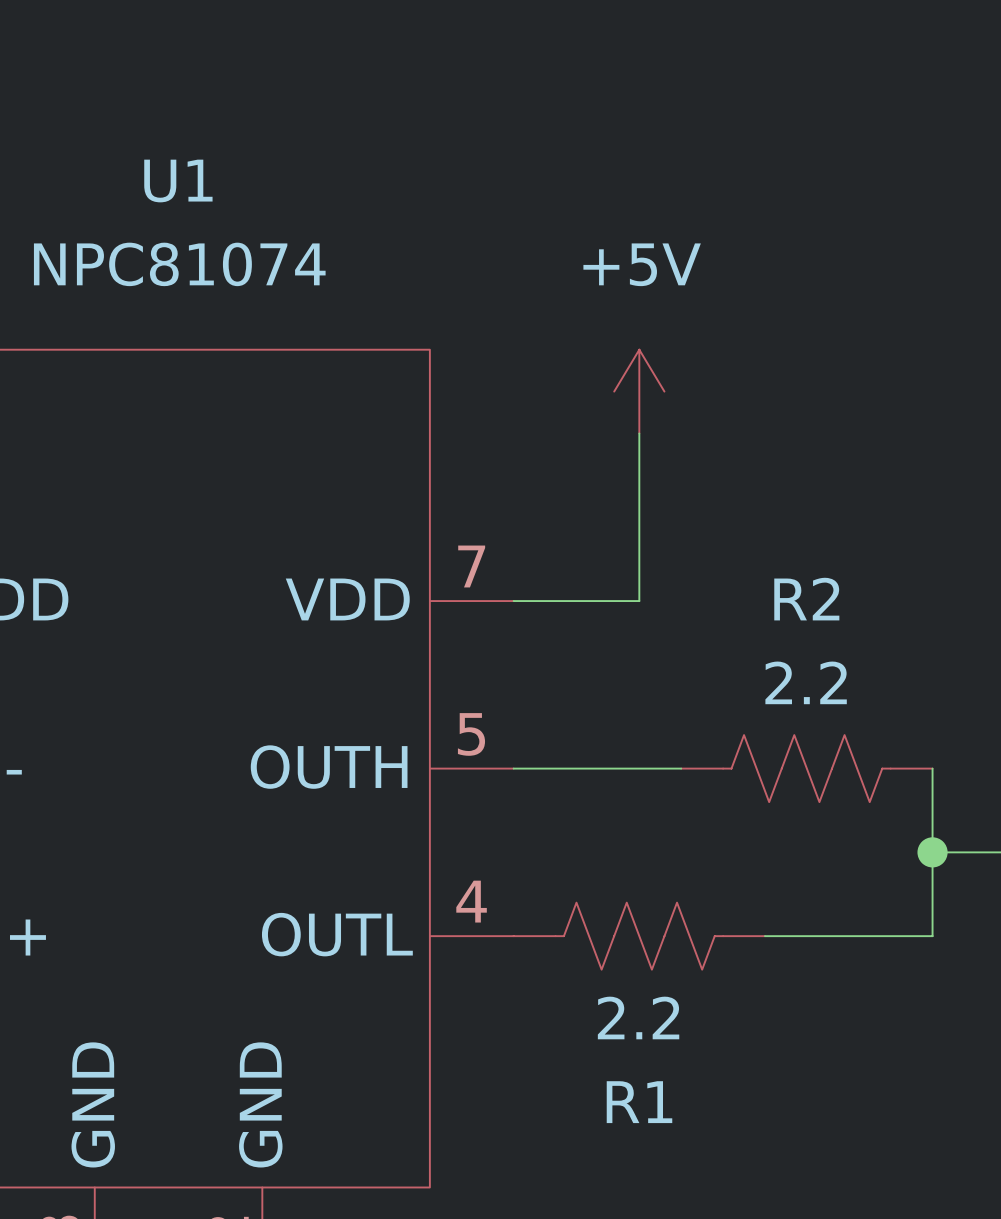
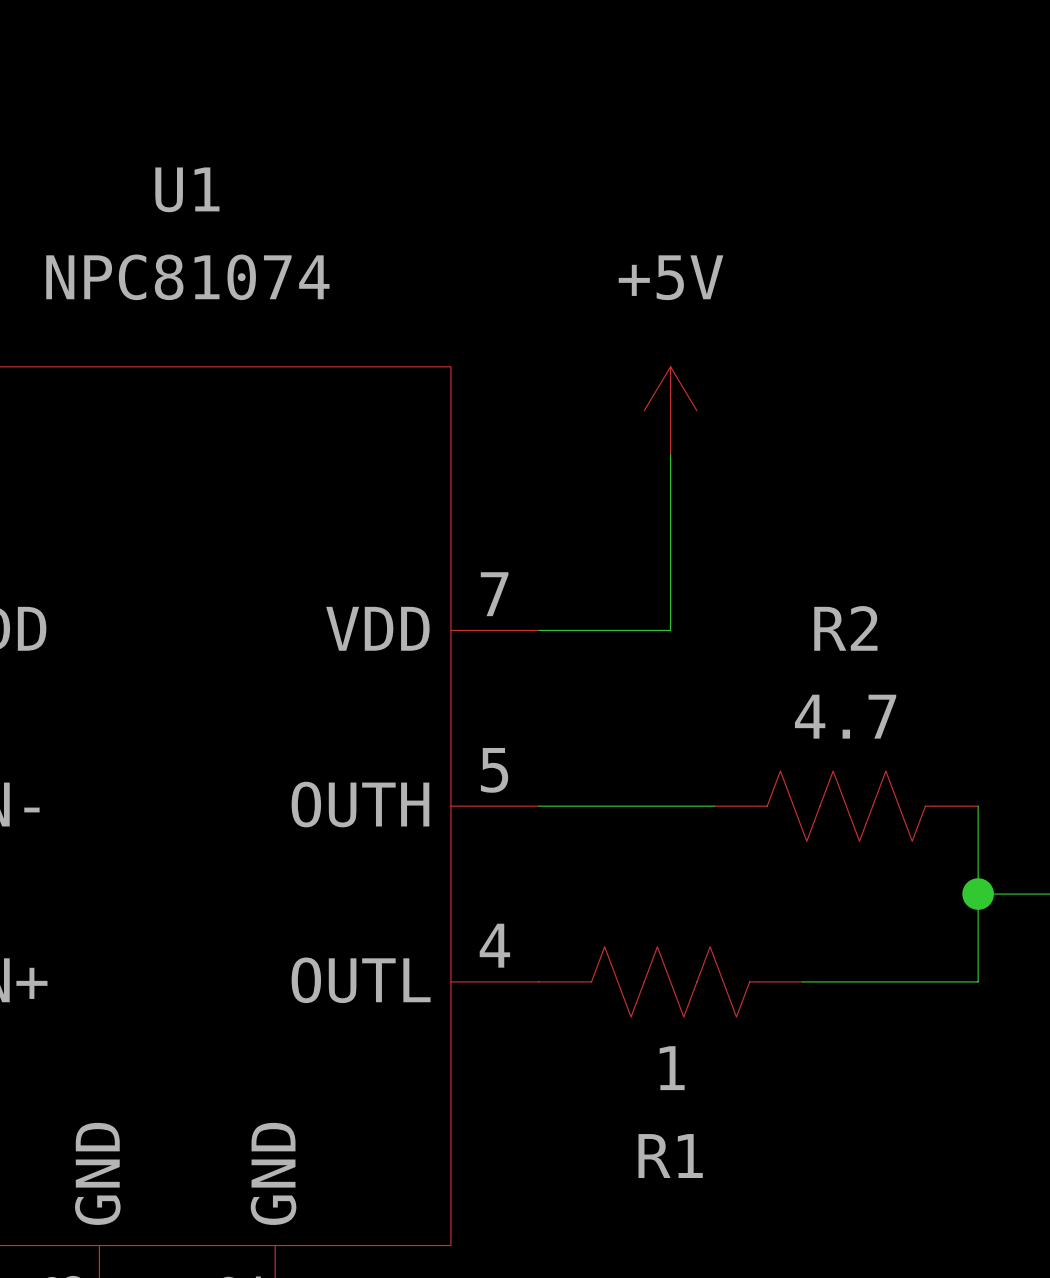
R2 value: 2.2 (806, 682) -> 4.7 (845, 716)
R1 value: 2.2 (638, 1017) -> 1 (672, 1068)

